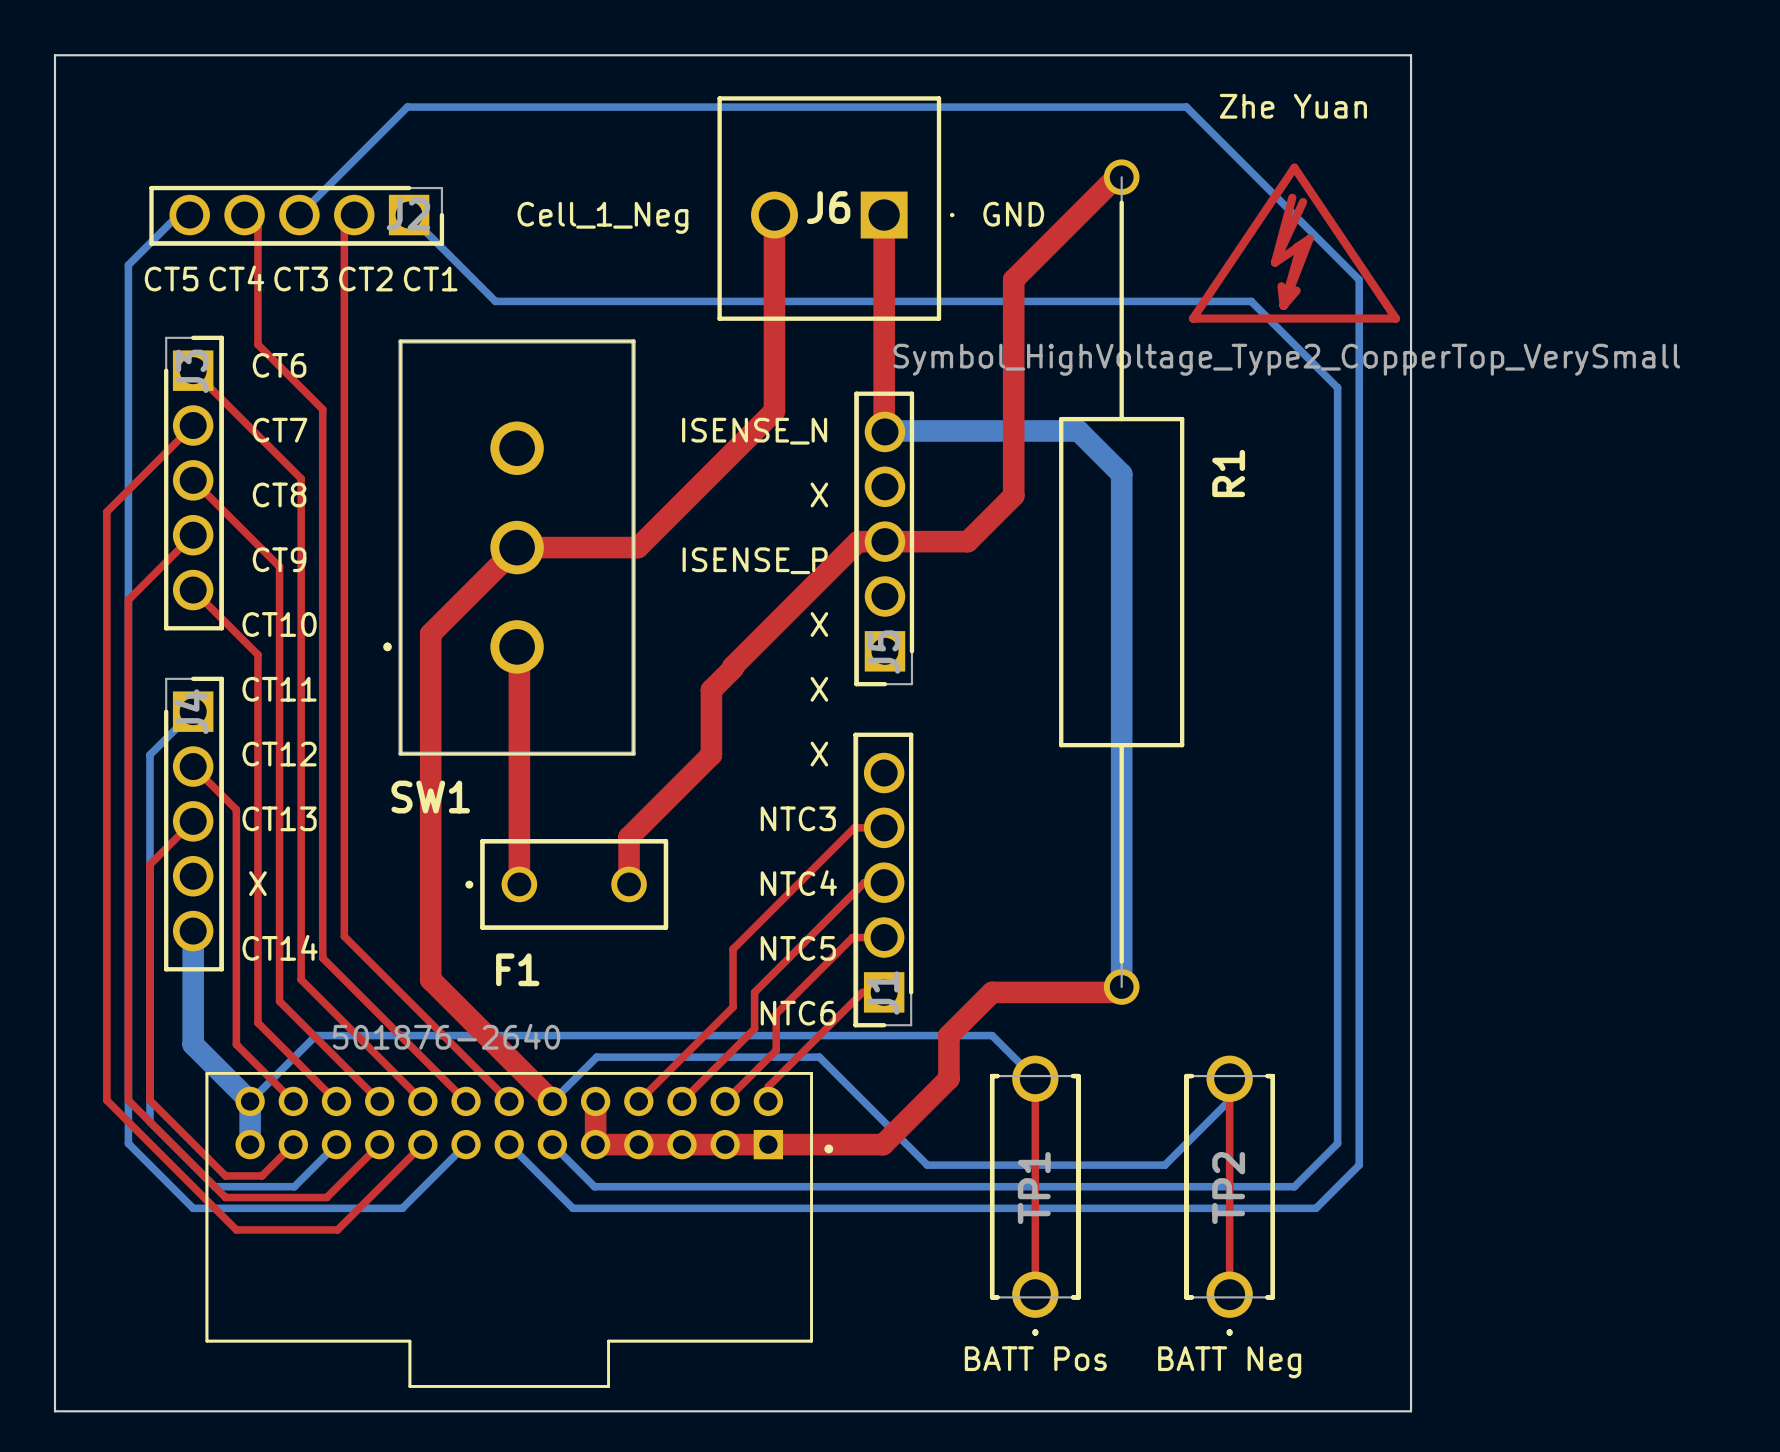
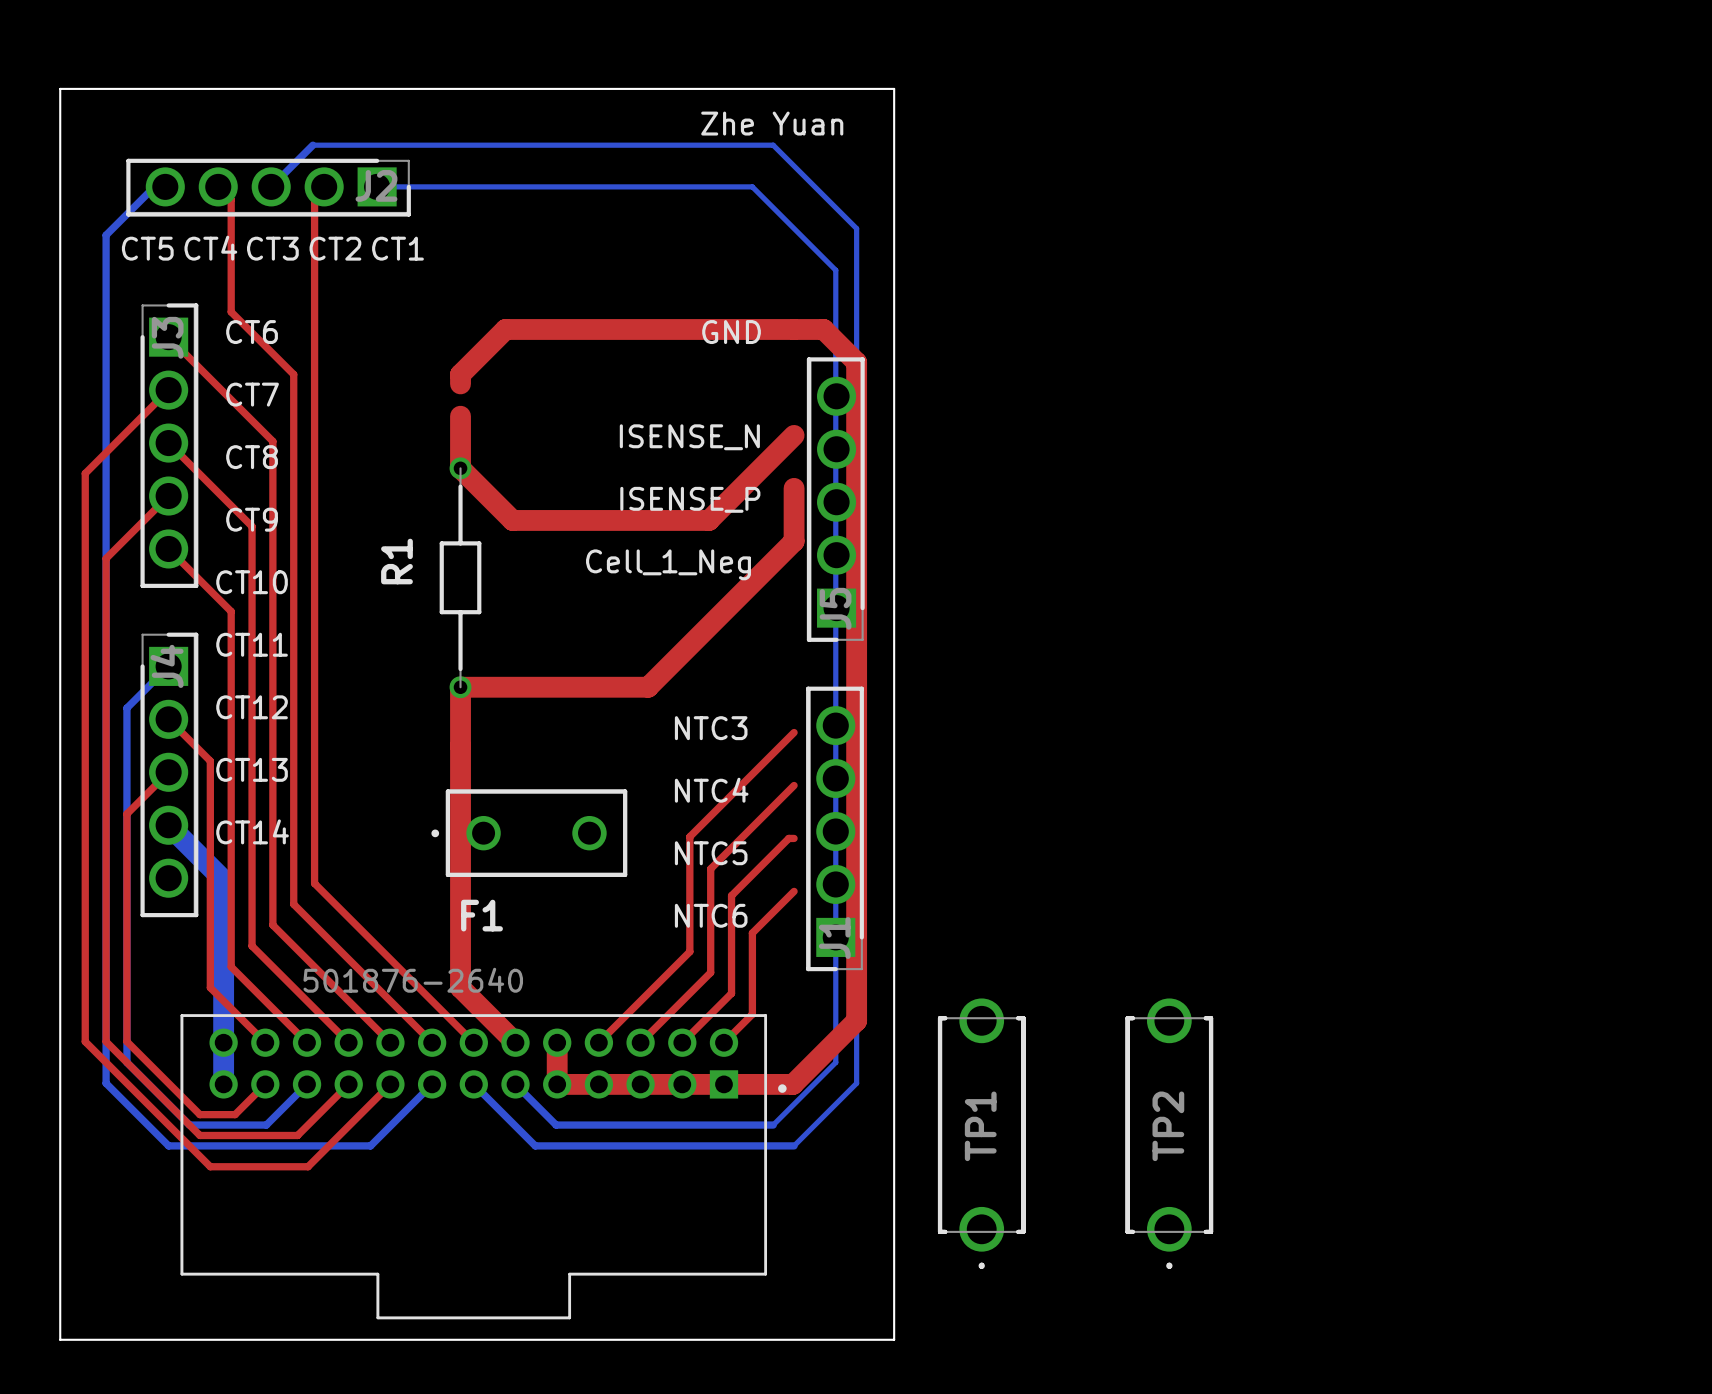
board edge: (54, 55) (1411, 55) (1411, 1411) (54, 1411) (54, 55) -> (60, 88) (60, 1339) (894, 1339) (894, 88) (60, 88)
text position: Zhe Yuan (1293, 106) -> Zhe Yuan (772, 123)
R1 footprint: [1059, 159, 1185, 1005] -> [439, 457, 482, 699]
drawing: [1188, 163, 1401, 323] -> none
bottom track: (342, 171) (407, 107) (1186, 107) (1359, 279) (1359, 1165) (1316, 1208) (840, 1208) -> (312, 145) (773, 145) (856, 228) (856, 1083) (794, 1145)
top track: (1121, 177) (1116, 177) (1013, 279) (1013, 495) (967, 541) (857, 541) (733, 666) (711, 690) (711, 754) (629, 837) (629, 884) -> none
J6: (835, 208) -> none
text position: GND (1013, 214) -> GND (731, 332)
bottom track: (409, 215) (495, 301) (1251, 301) (1337, 387) (1337, 1143) (1294, 1186) (819, 1186) -> (377, 186) (752, 186) (835, 270) (835, 1062) (773, 1125)
text position: Cell_1_Neg (602, 217) -> Cell_1_Neg (668, 564)
top track: (774, 221) (774, 411) (638, 547) (517, 547) (430, 633) (430, 979) (495, 1044) -> (794, 488) (794, 541) (648, 687) (460, 687) (460, 987)
top track: (884, 221) (884, 431) -> none
text position: ISENSE_N (754, 431) -> ISENSE_N (689, 437)
bottom track: (884, 431) (1078, 430) (1121, 474) (1121, 986) -> none
top track: none -> (460, 416) (460, 468) (512, 520) (709, 520) (794, 435)
R1 name position: R1 (1228, 473) -> R1 (396, 561)
text: X (819, 494) -> none
SW1: (509, 547) -> none
text position: ISENSE_P (755, 560) -> ISENSE_P (690, 499)
text: X (819, 624) -> none
top track: (517, 646) (519, 649) (519, 884) -> none
text: X (819, 689) -> none
text: X (819, 754) -> none
text position: NTC3 (798, 818) -> NTC3 (711, 728)
top track: (884, 827) (854, 827) (733, 949) -> (794, 732) (689, 836) (689, 895)
bottom track: none -> (168, 825) (223, 880) (223, 1042)
top track: (884, 882) (864, 882) (754, 992) -> (794, 785) (710, 868) (710, 937)
text: X (257, 883) -> none
text position: NTC4 (798, 883) -> NTC4 (711, 790)
bottom track: (193, 931) (193, 1044) (250, 1101) (315, 1035) (992, 1035) (1035, 1078) -> none
top track: (884, 937) (852, 937) (776, 1013) -> (794, 838) (788, 838) (731, 895) (731, 958)
text position: CT14 (280, 947) -> CT14 (252, 831)
text position: NTC5 (798, 948) -> NTC5 (711, 853)
top track: (1121, 986) (1116, 992) (992, 992) (948, 1035) (948, 1078) (883, 1144) (839, 1144) -> (460, 383) (460, 374) (505, 329) (823, 329) (856, 362) (856, 1020) (793, 1084)
top track: (884, 992) (862, 992) (768, 1086) (768, 1101) -> (794, 891) (752, 933) (752, 1014) (723, 1042)
text position: NTC6 (798, 1013) -> NTC6 (711, 915)
top track: (1035, 1078) (1035, 1294) -> none
top track: (1229, 1078) (1229, 1294) -> none
bottom track: (1229, 1078) (1229, 1100) (1164, 1165) (927, 1165) (819, 1057) (596, 1057) (552, 1101) -> none
text: BATT Pos (1035, 1358) -> none
text: BATT Neg (1229, 1362) -> none

